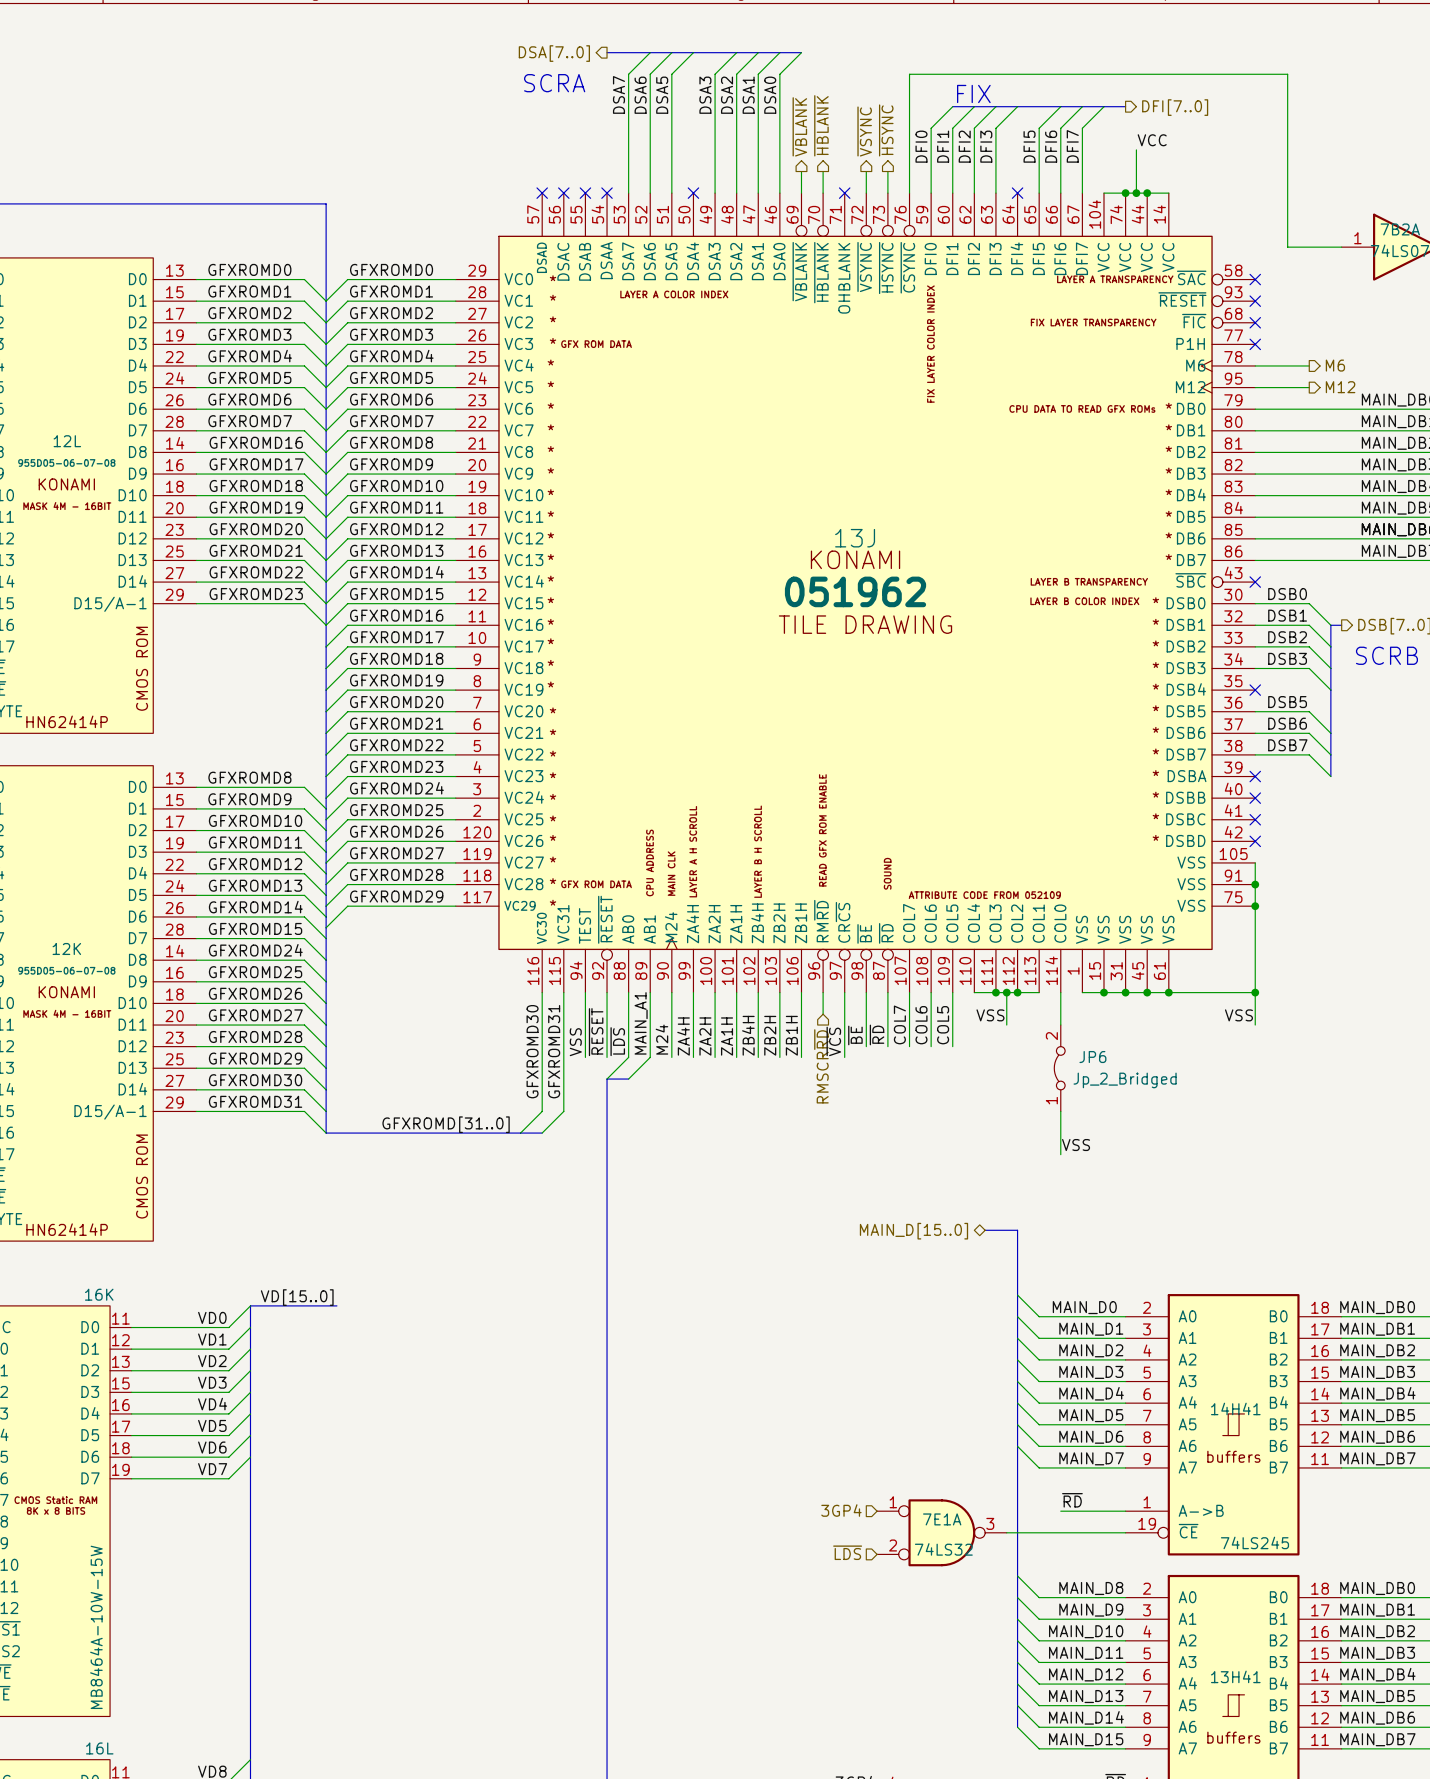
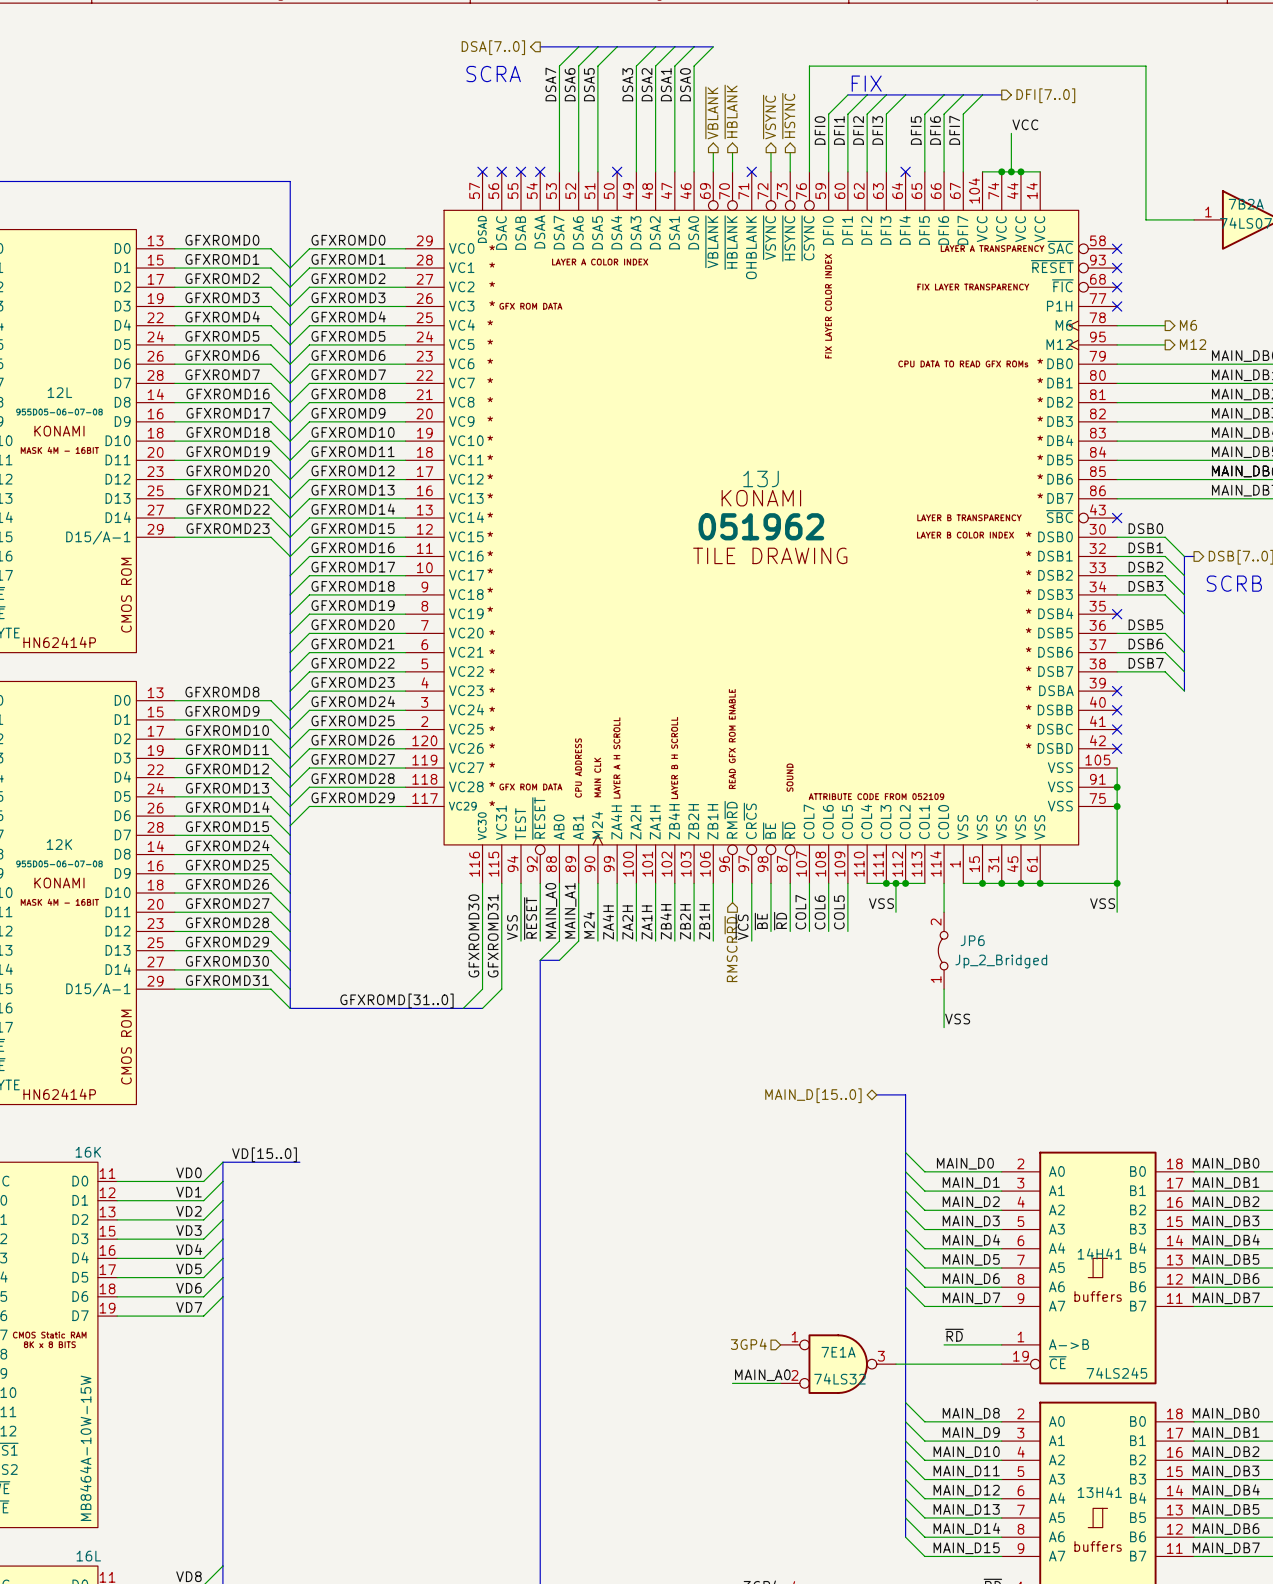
label: ~{LDS} (617, 1041) -> MAIN_A0 (551, 910)
label: none -> MAIN_A0 (762, 1375)
hierarchical label: ~{LDS} (847, 1552) -> none
wire: none -> (732, 1383) (780, 1383)

